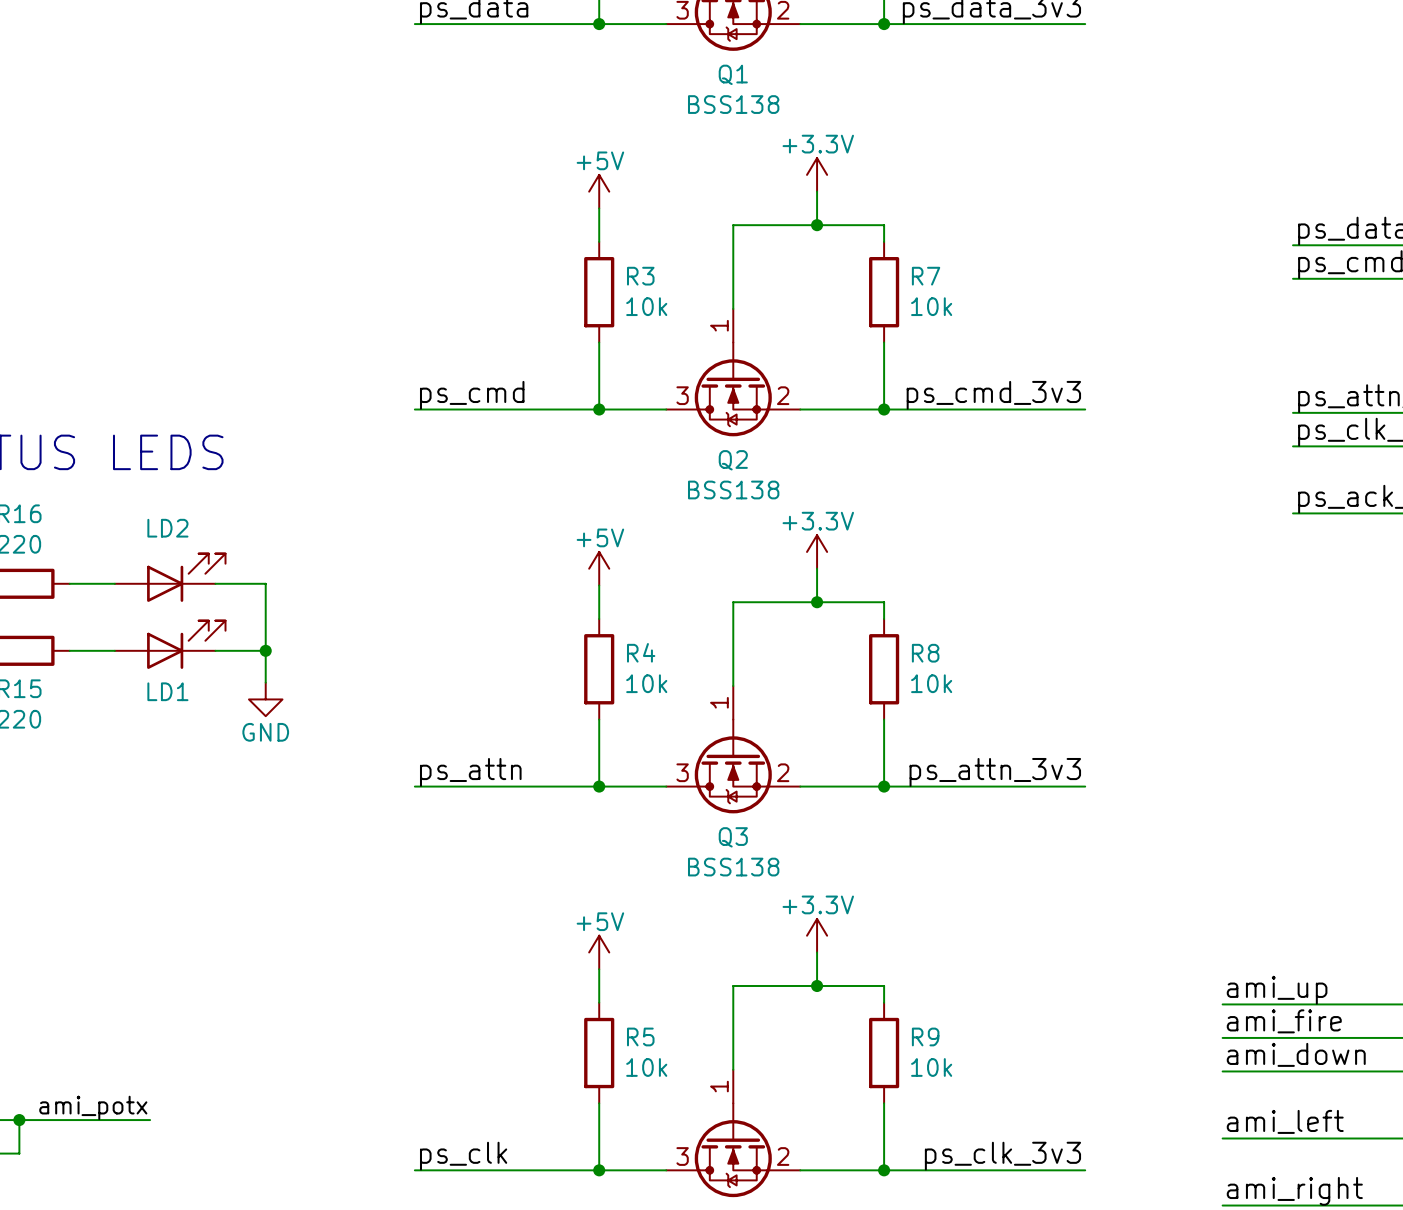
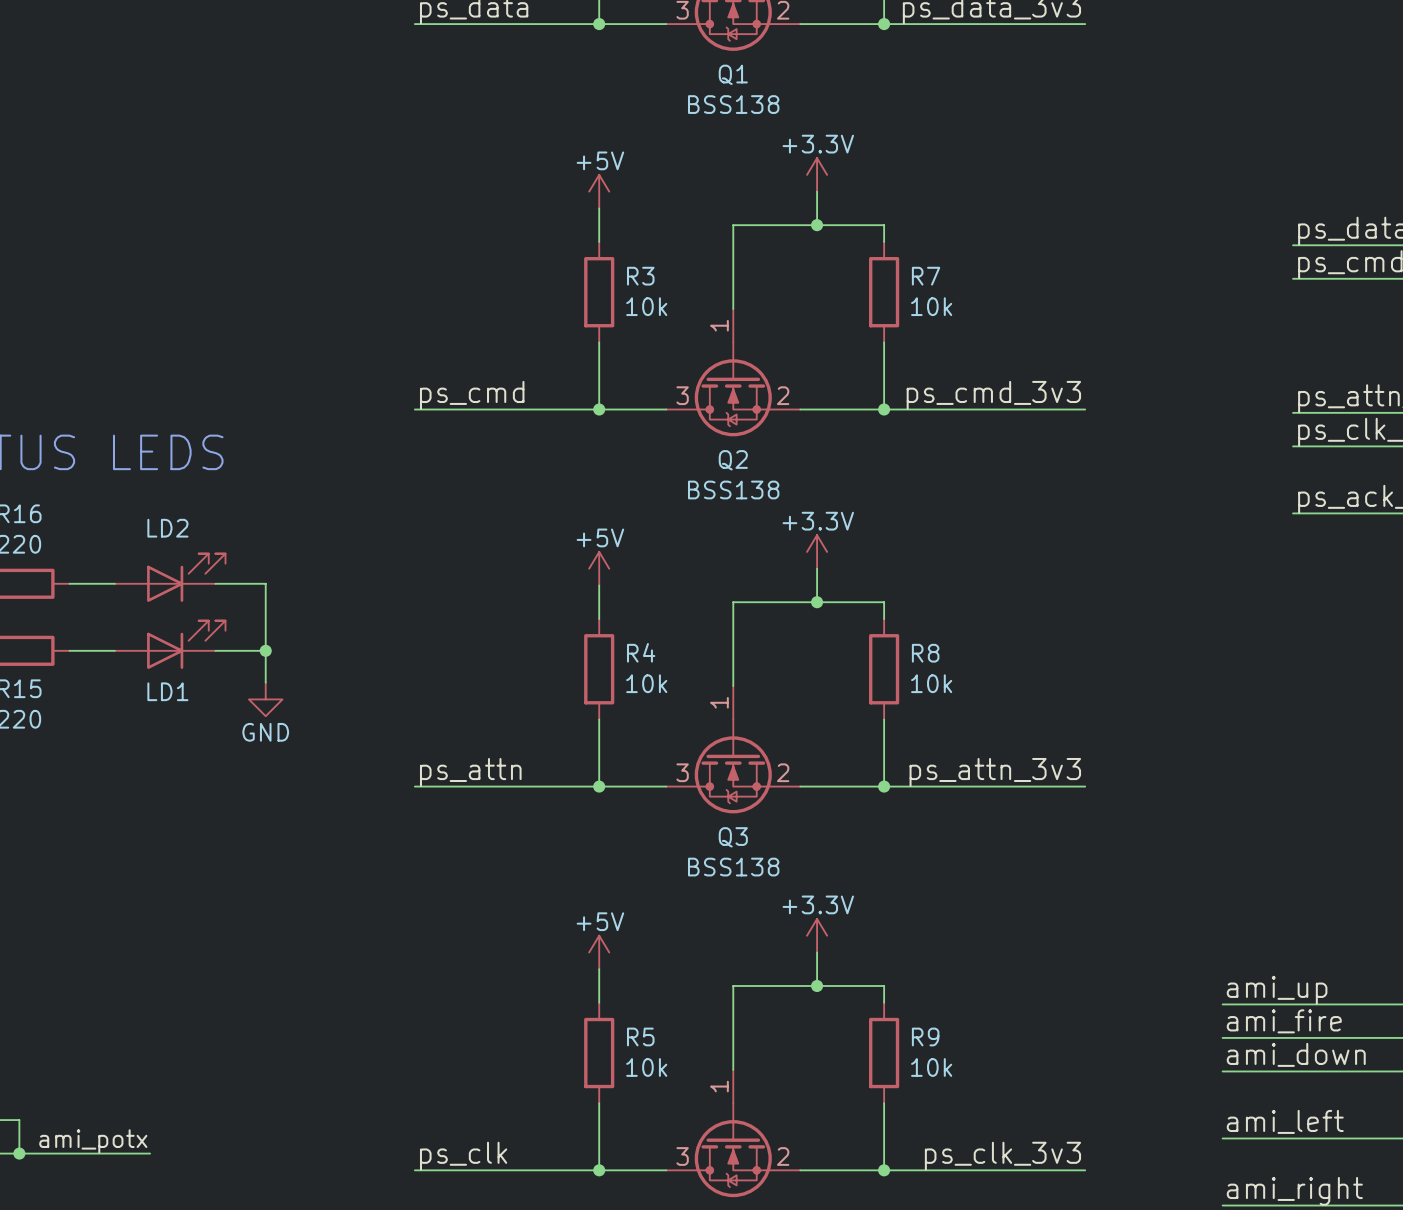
label position: ami_potx (93, 1107) -> ami_potx (93, 1141)
wire: (19, 1120) (150, 1120) -> (19, 1153) (150, 1153)
junction position: (19, 1120) -> (19, 1153)

